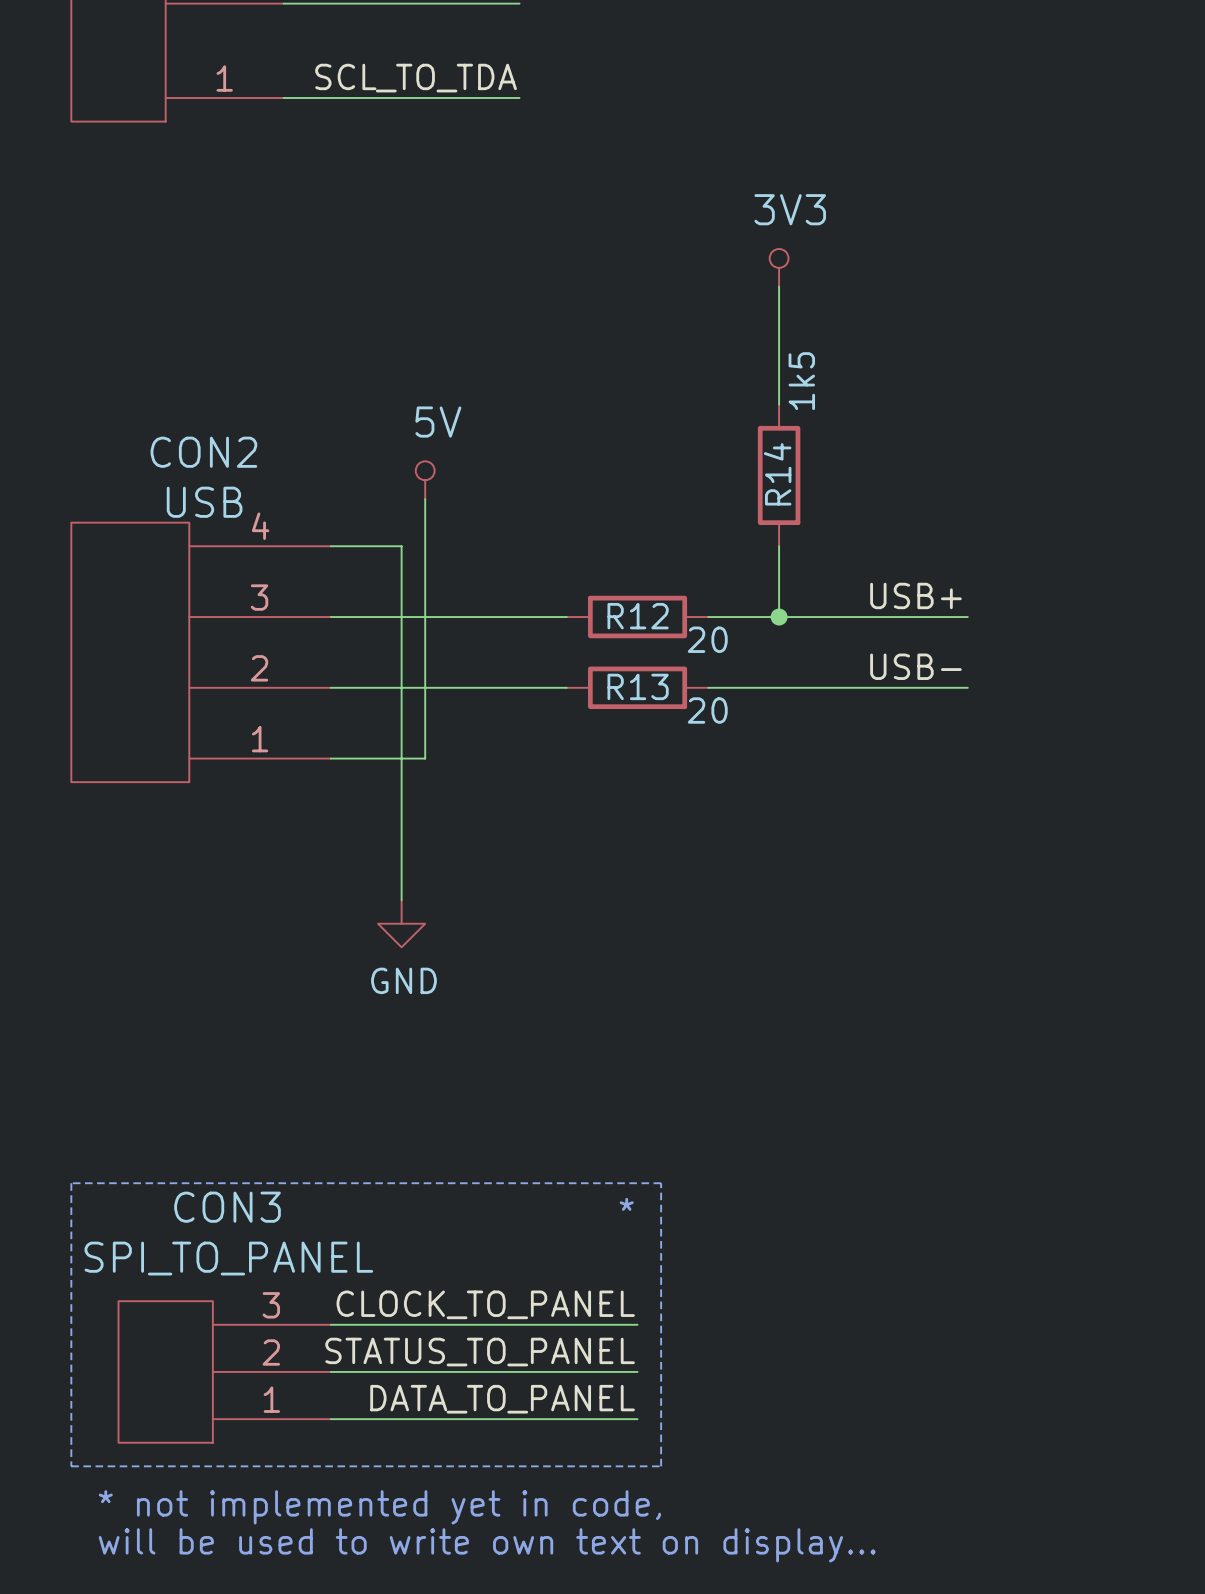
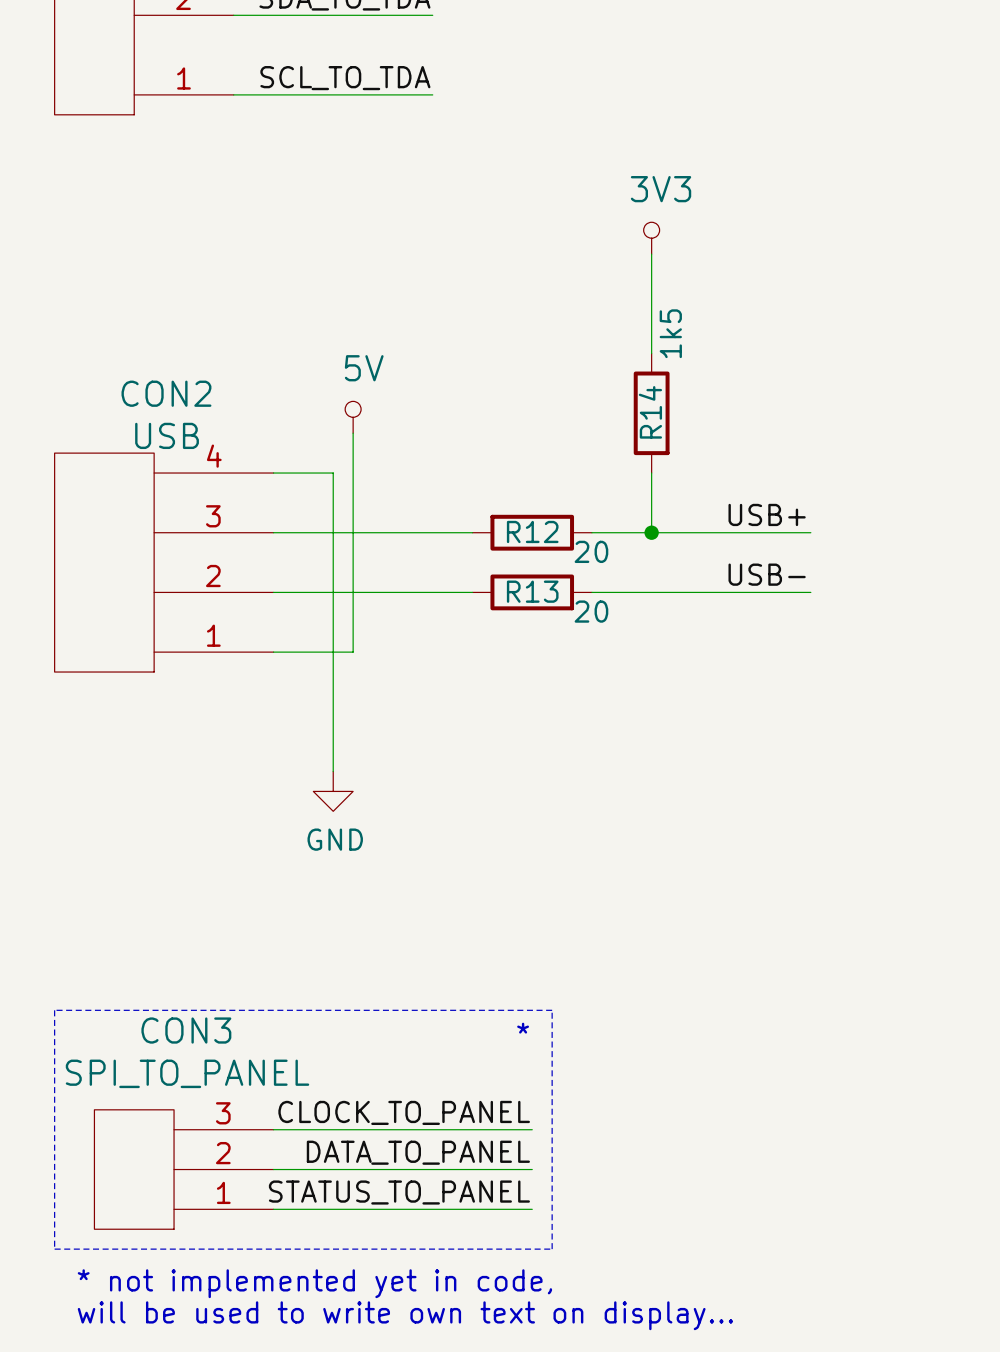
label: STATUS_TO_PANEL (480, 1352) -> DATA_TO_PANEL (418, 1152)
label: DATA_TO_PANEL (502, 1399) -> STATUS_TO_PANEL (399, 1192)

